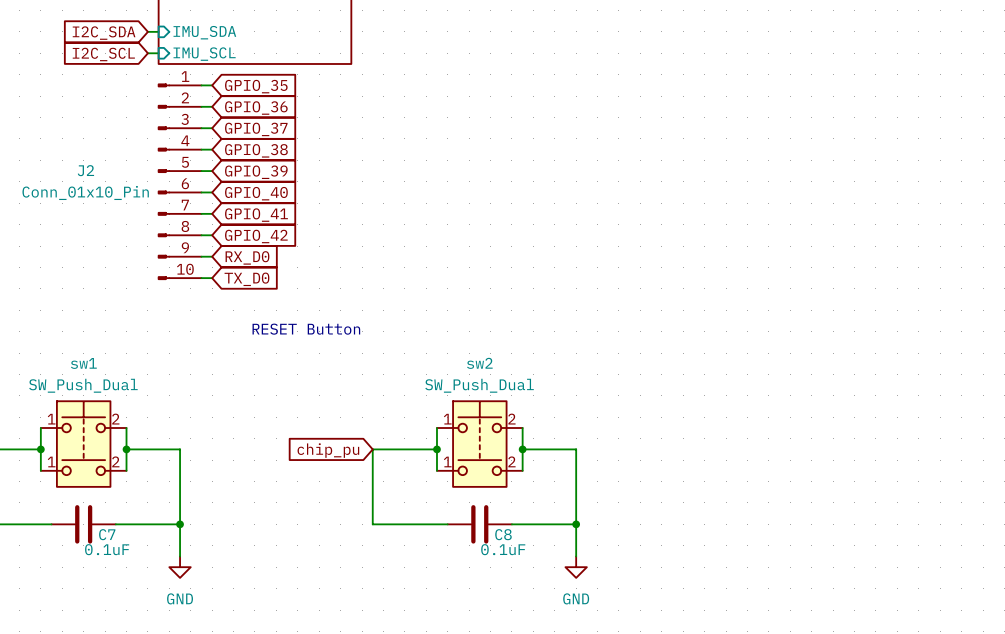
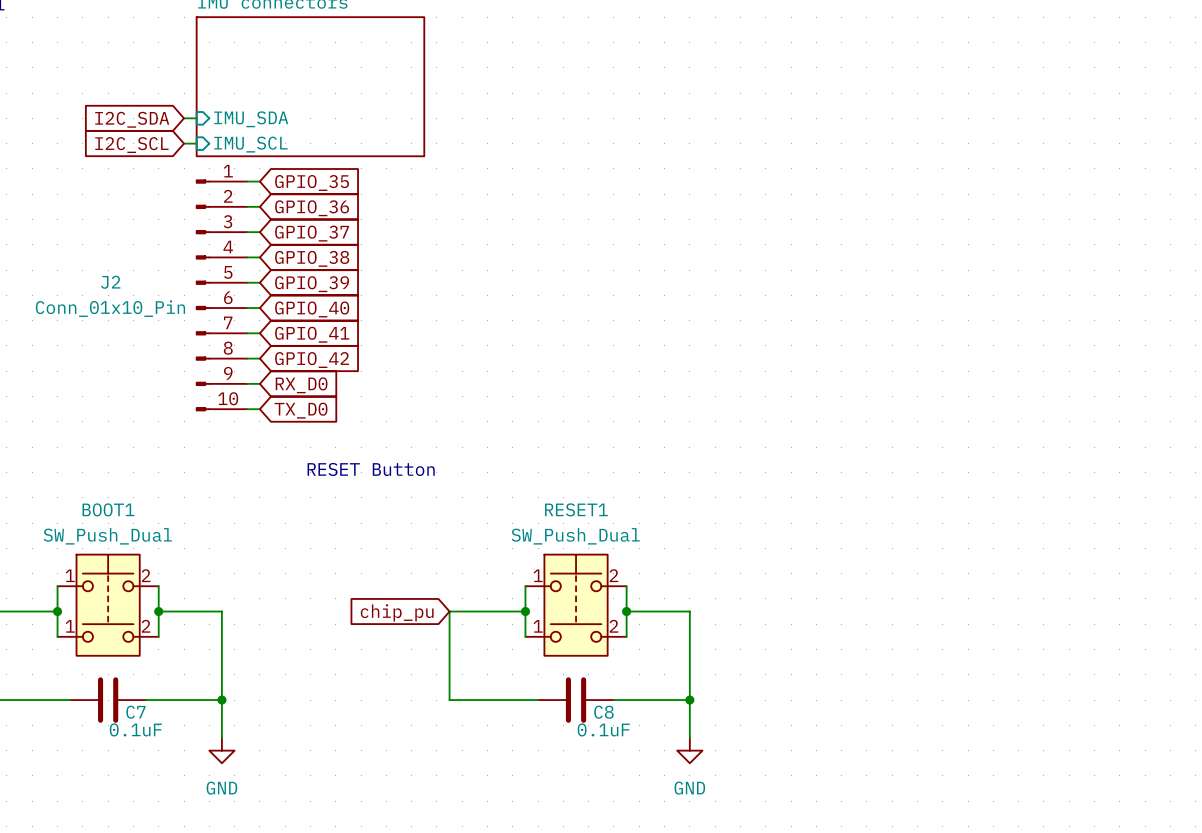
sw1 name: sw1 (83, 363) -> BOOT1 (108, 509)
sw2 name: sw2 (479, 363) -> RESET1 (576, 509)

